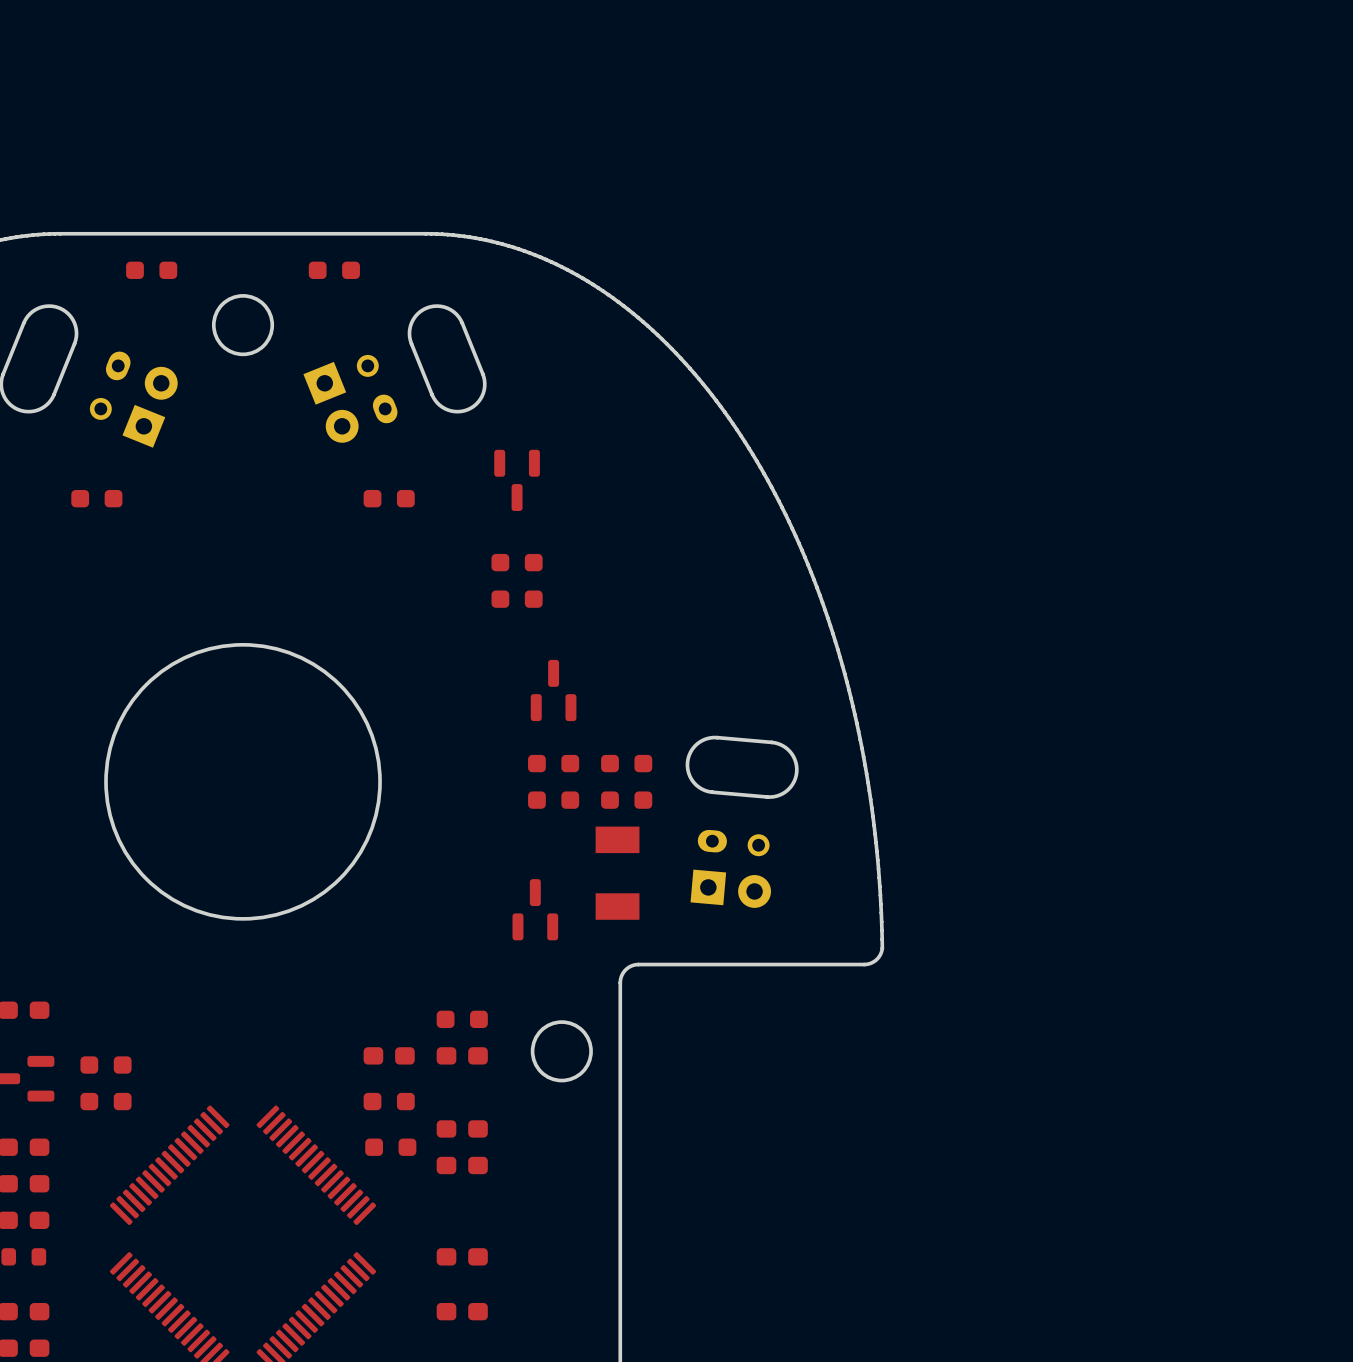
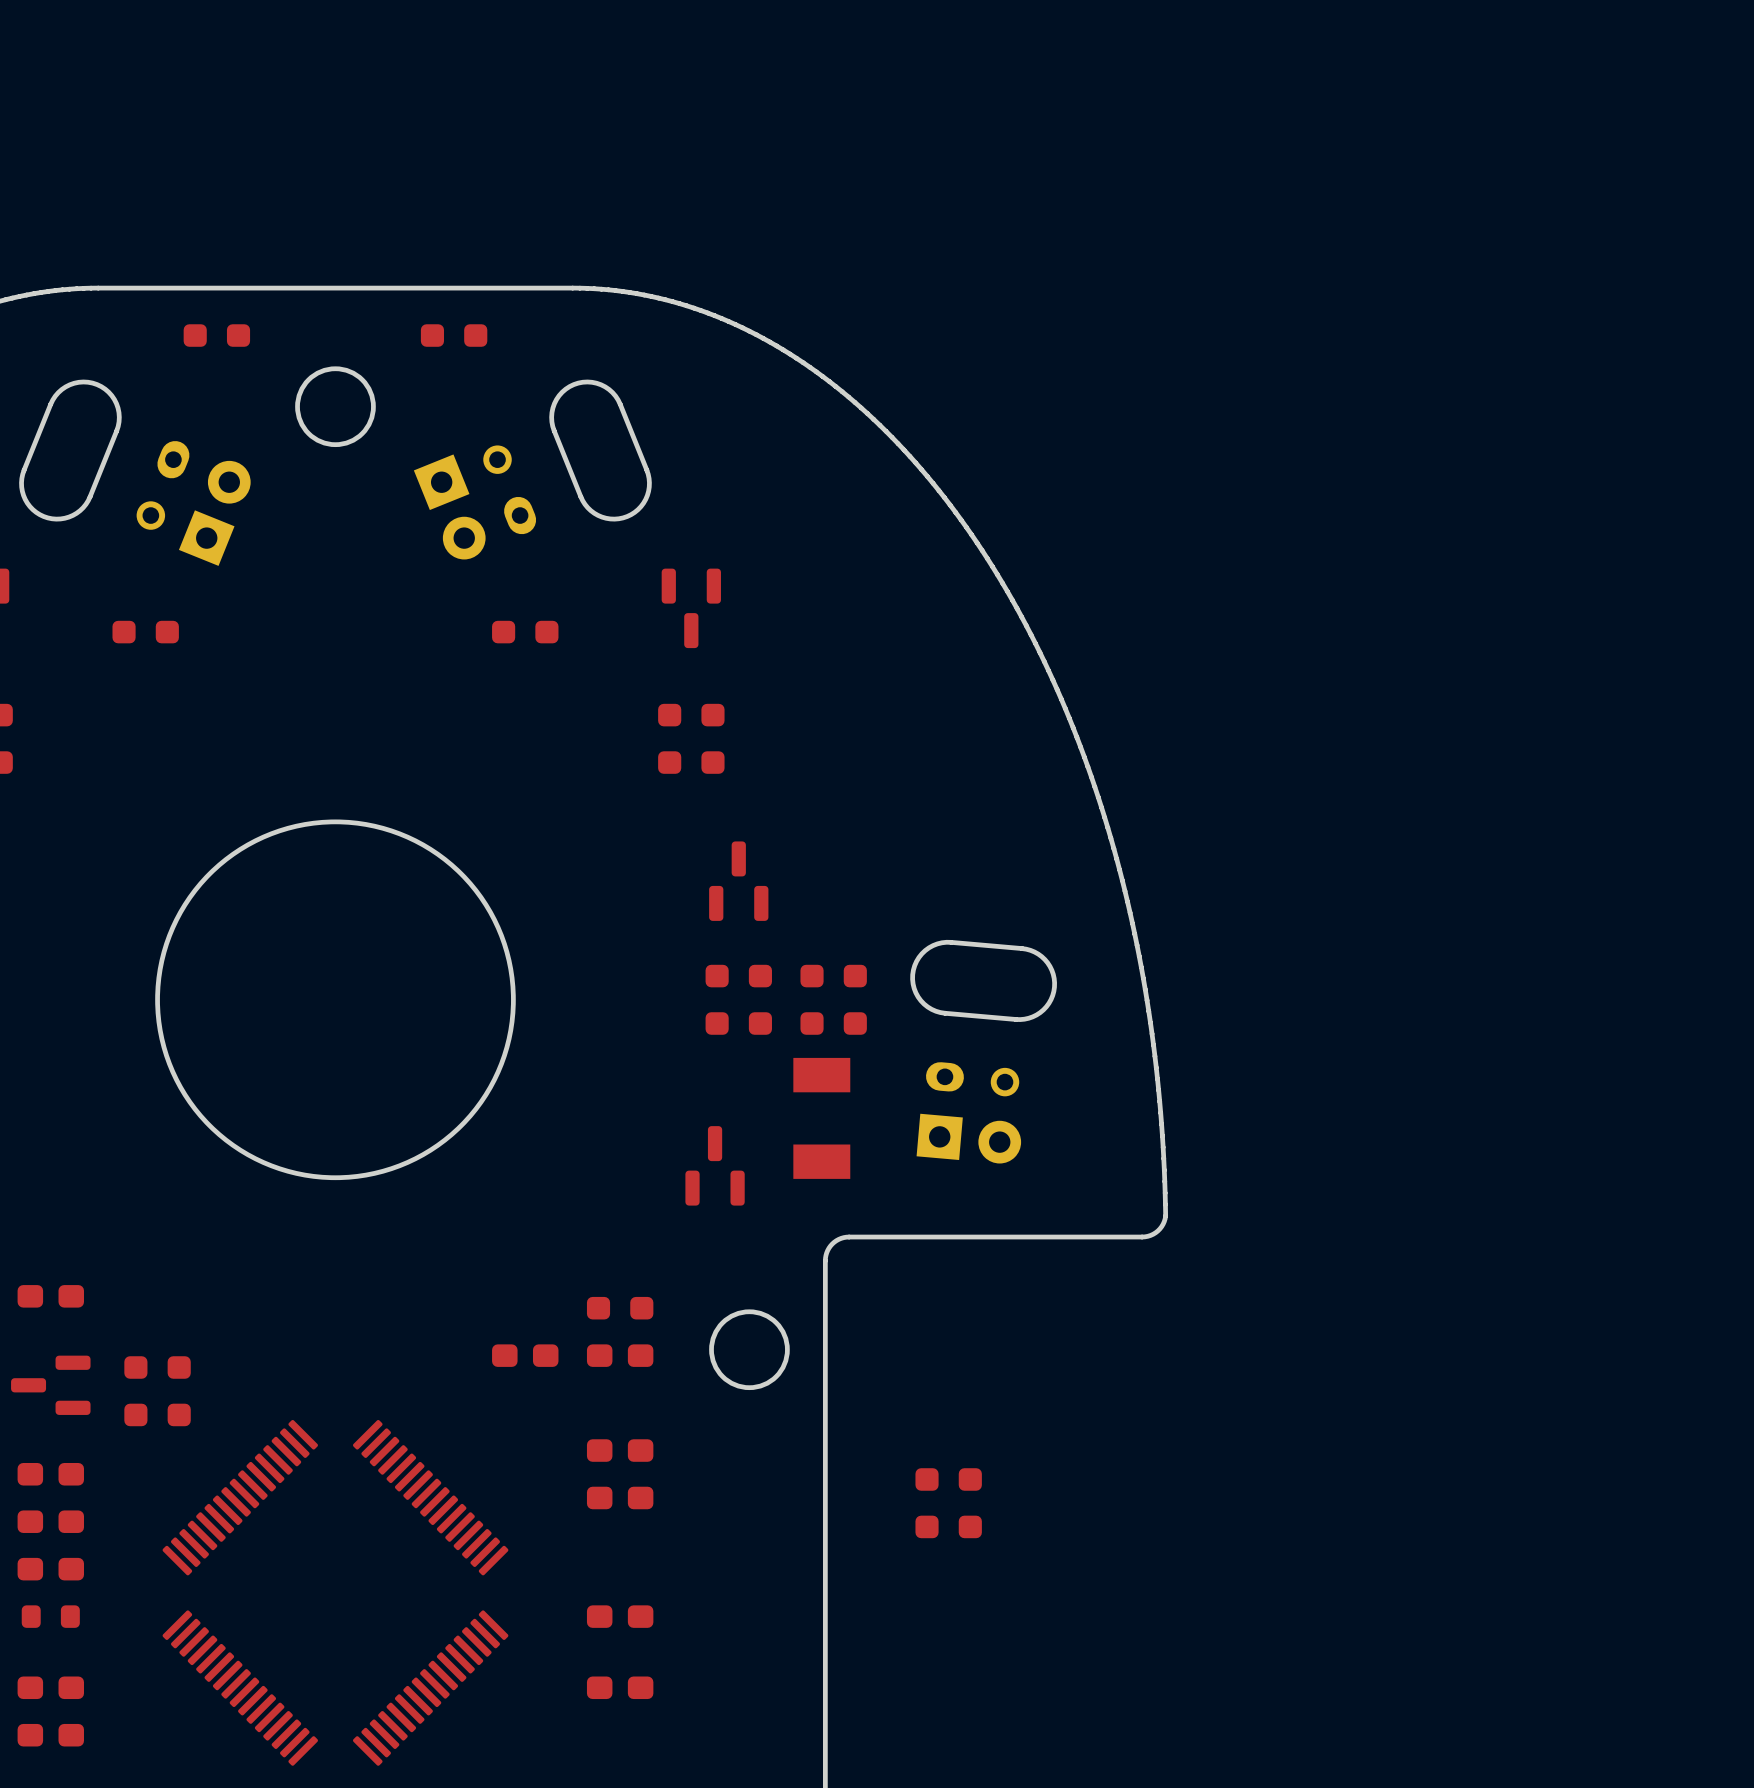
part: (389, 1101) -> none
part: (390, 1147) -> none
part: none -> (948, 1479)
part: none -> (948, 1526)

